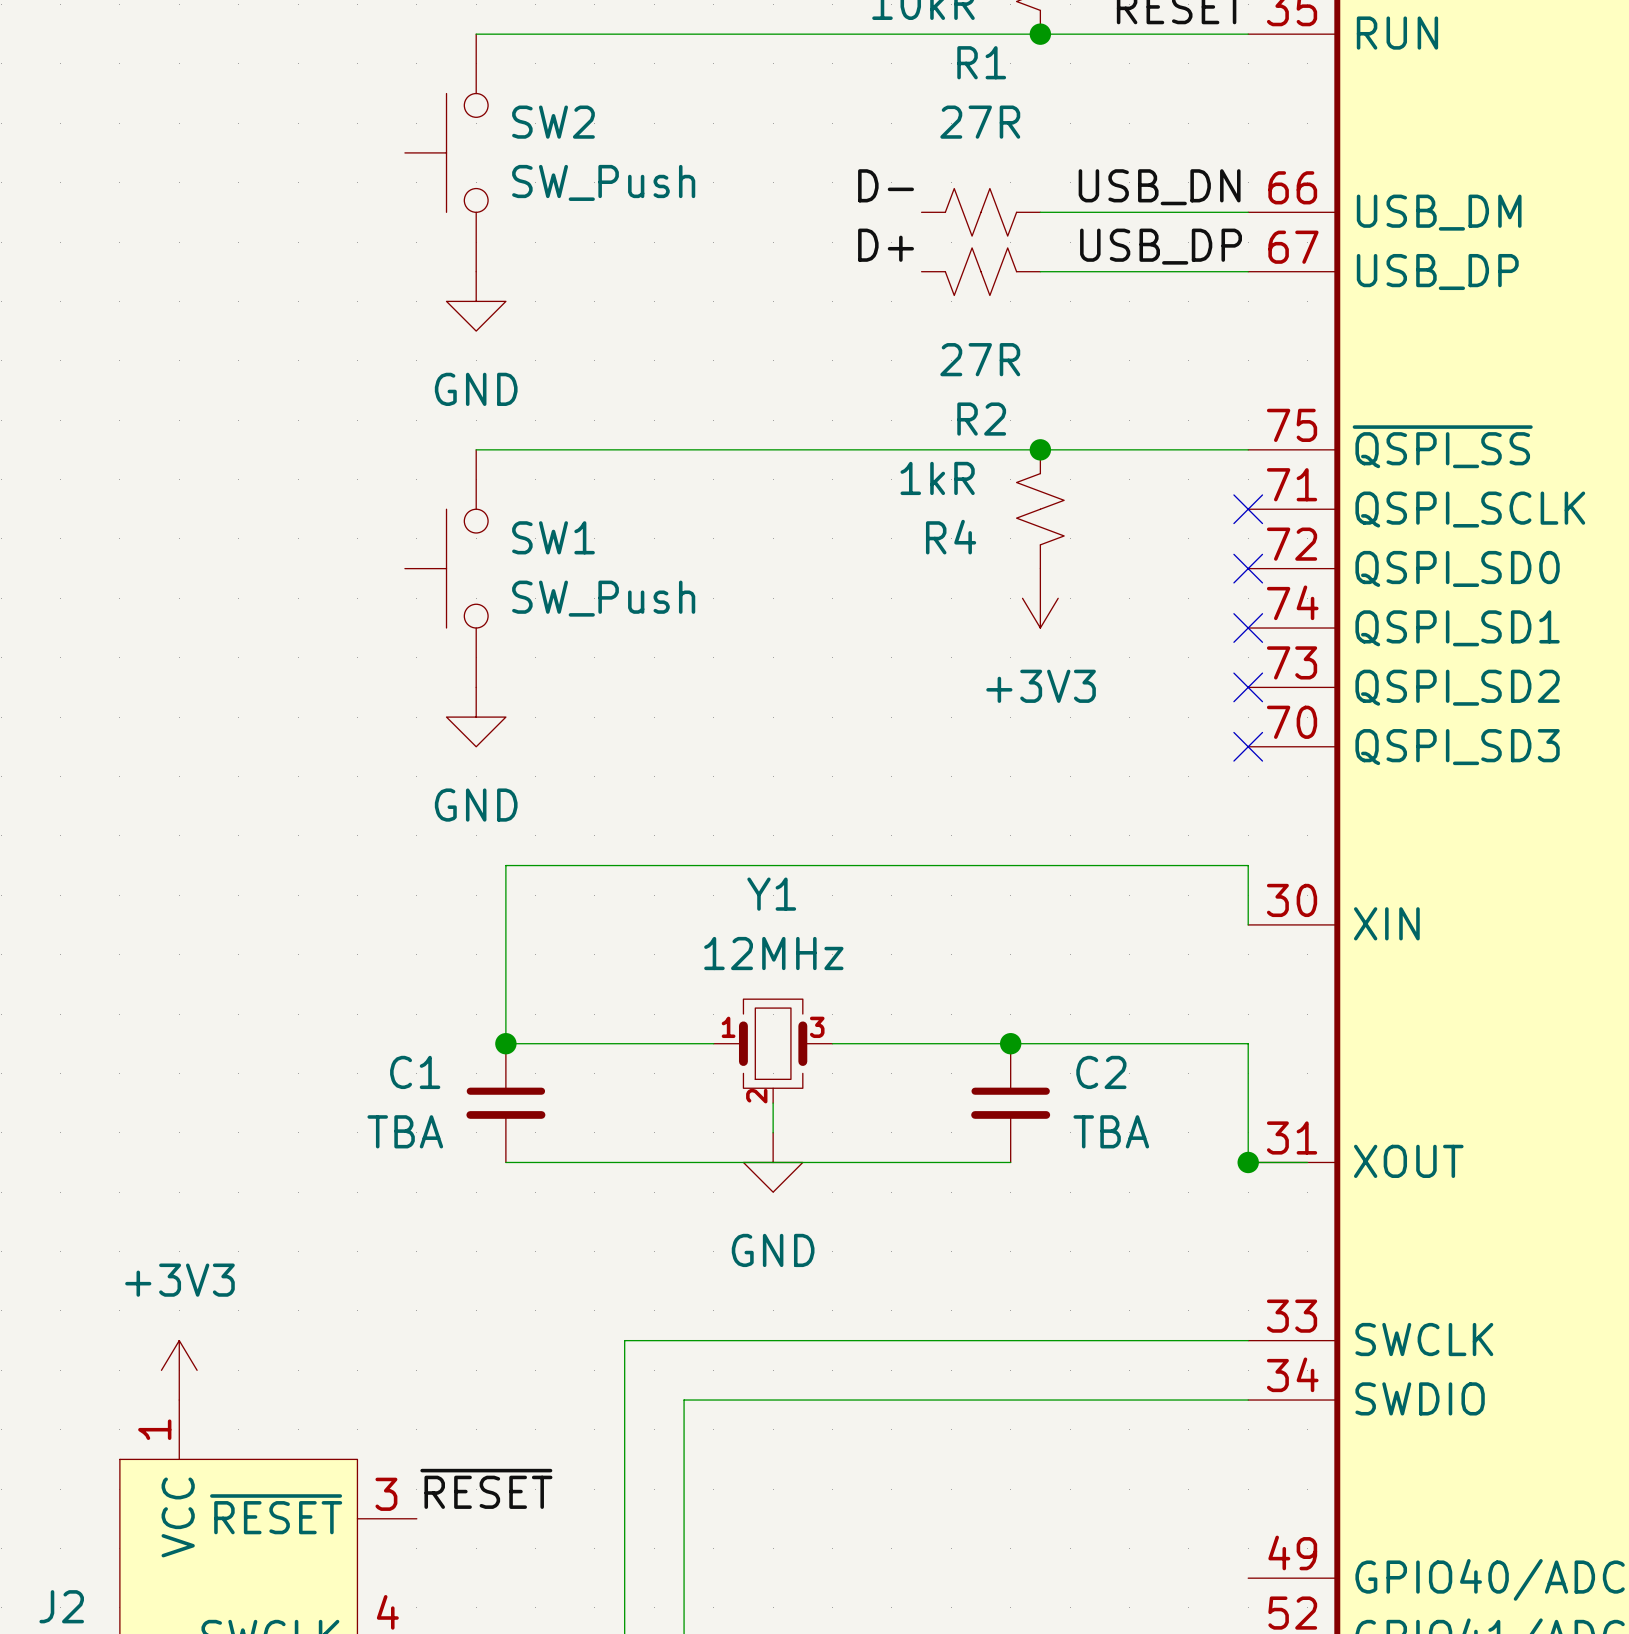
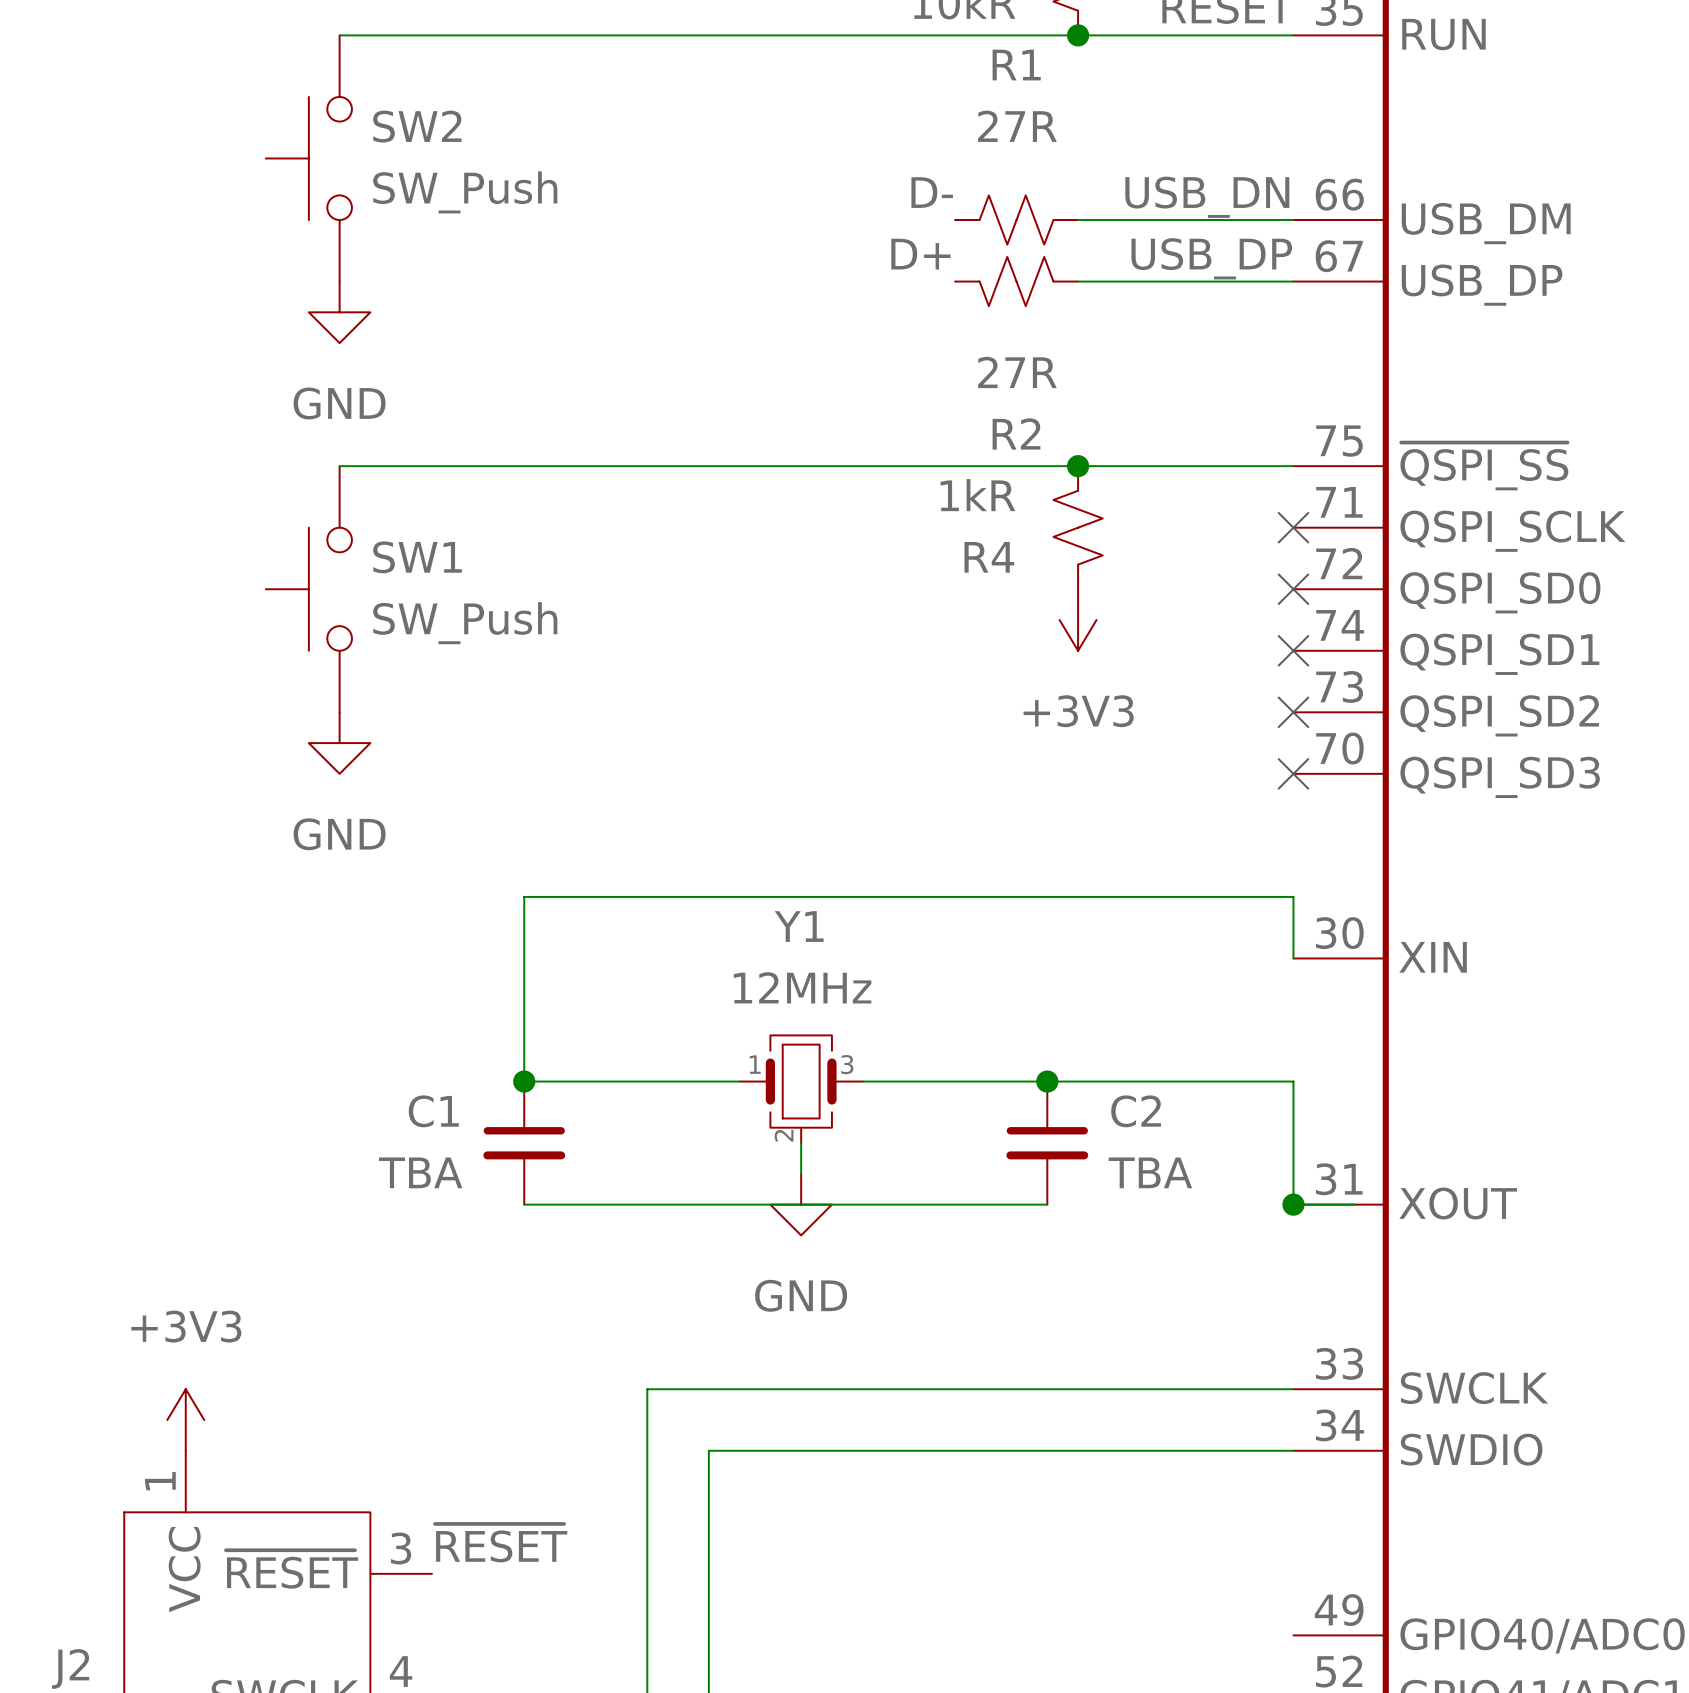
wire: none -> (339, 35) (493, 35)
SW2 position: (446, 152) -> (308, 158)
power symbol position: GND (476, 301) -> GND (339, 312)
wire: none -> (339, 466) (493, 466)
SW1 position: (446, 568) -> (308, 589)
power symbol position: GND (476, 717) -> GND (339, 743)

